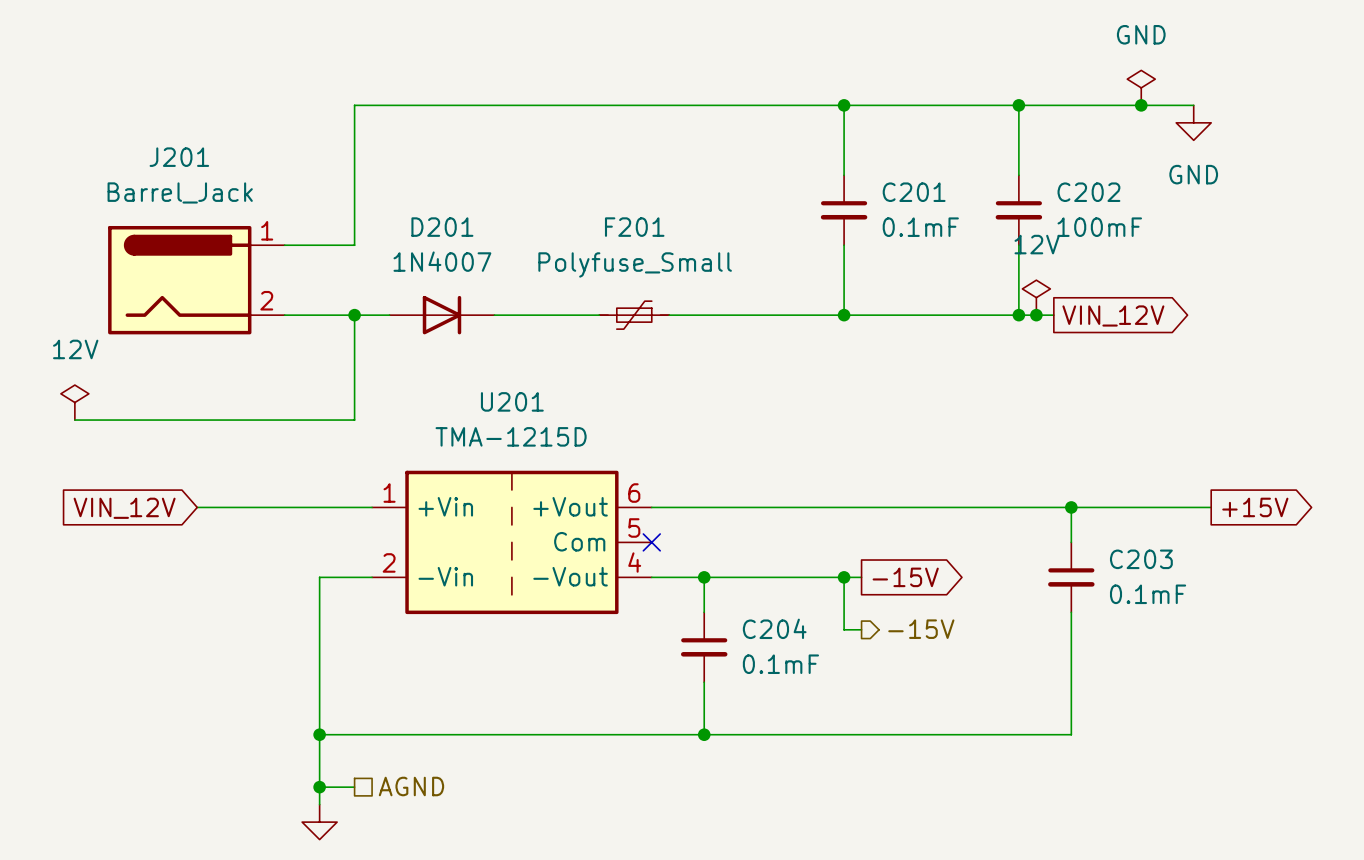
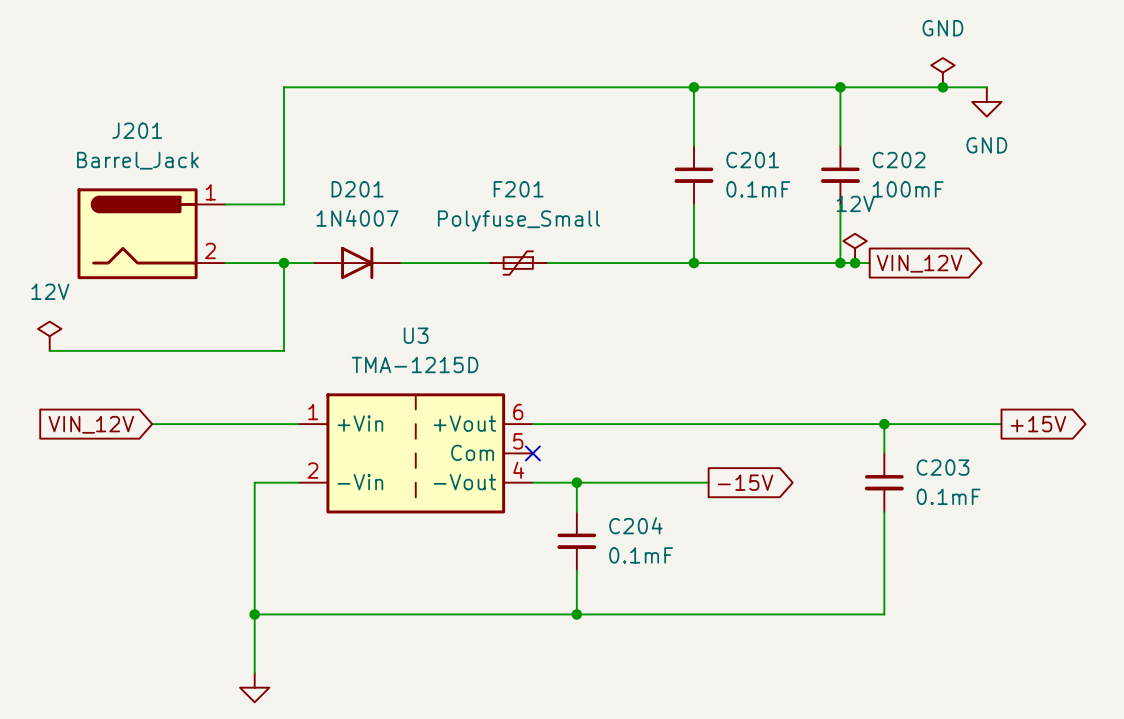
U201 name: U201 (512, 401) -> U3 (416, 335)
wire: (844, 577) (844, 629) (861, 629) -> none
junction: (844, 577) -> none
hierarchical label: -15V (921, 629) -> none
hierarchical label: AGND (411, 786) -> none
wire: (319, 787) (354, 787) -> none
junction: (319, 787) -> none

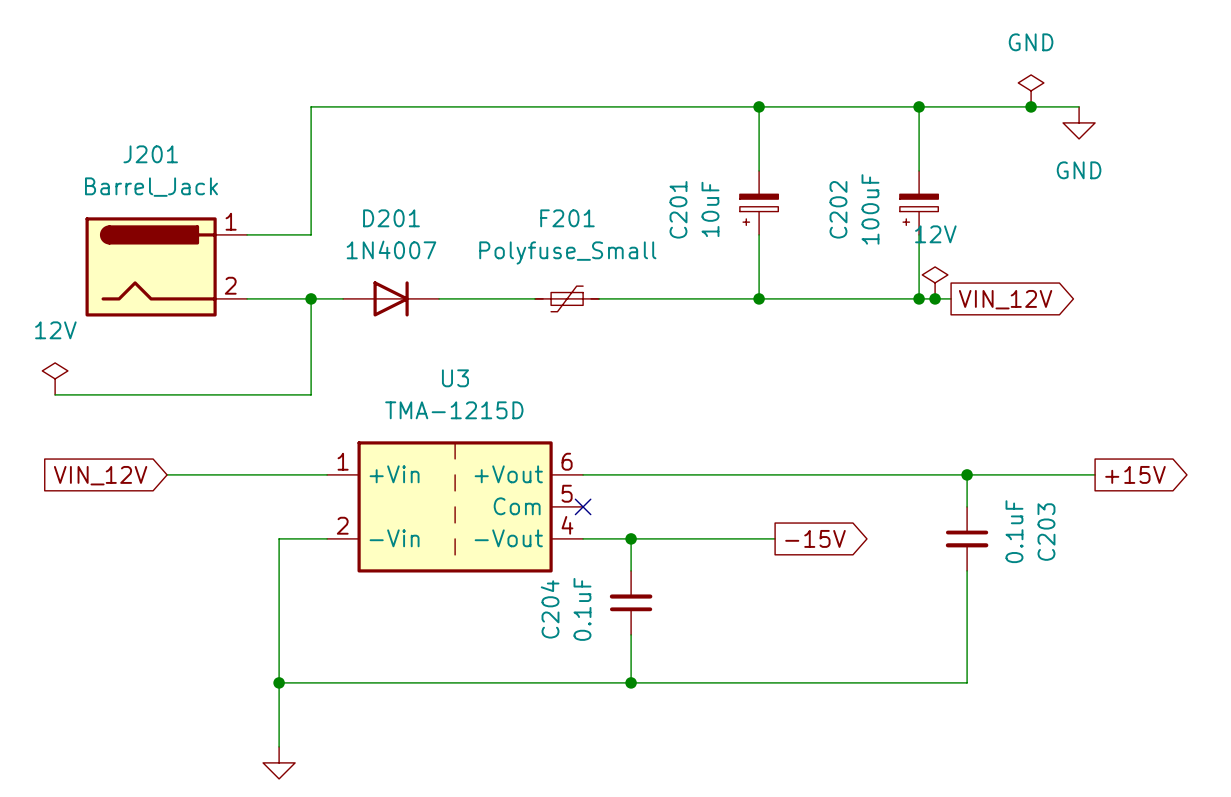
C201 symbol: [674, 145, 714, 205] -> [739, 170, 779, 235]
C202 symbol: [820, 145, 860, 205] -> [899, 170, 939, 235]
C201 name position: C201 (752, 160) -> C201 (678, 209)
C202 name position: C202 (899, 160) -> C202 (838, 209)
C201 value: 0.1mF (758, 189) -> 10uF (710, 209)
C202 value: 100mF (908, 189) -> 100uF (870, 209)
C203 name rotation: 0° (943, 467) -> 90° counterclockwise (1046, 532)
C203 value: 0.1mF (948, 496) -> 0.1uF (1014, 531)
C204 rotation: 0° (576, 541) -> 180° (631, 602)
C204 value: 0.1mF (641, 555) -> 0.1uF (582, 609)

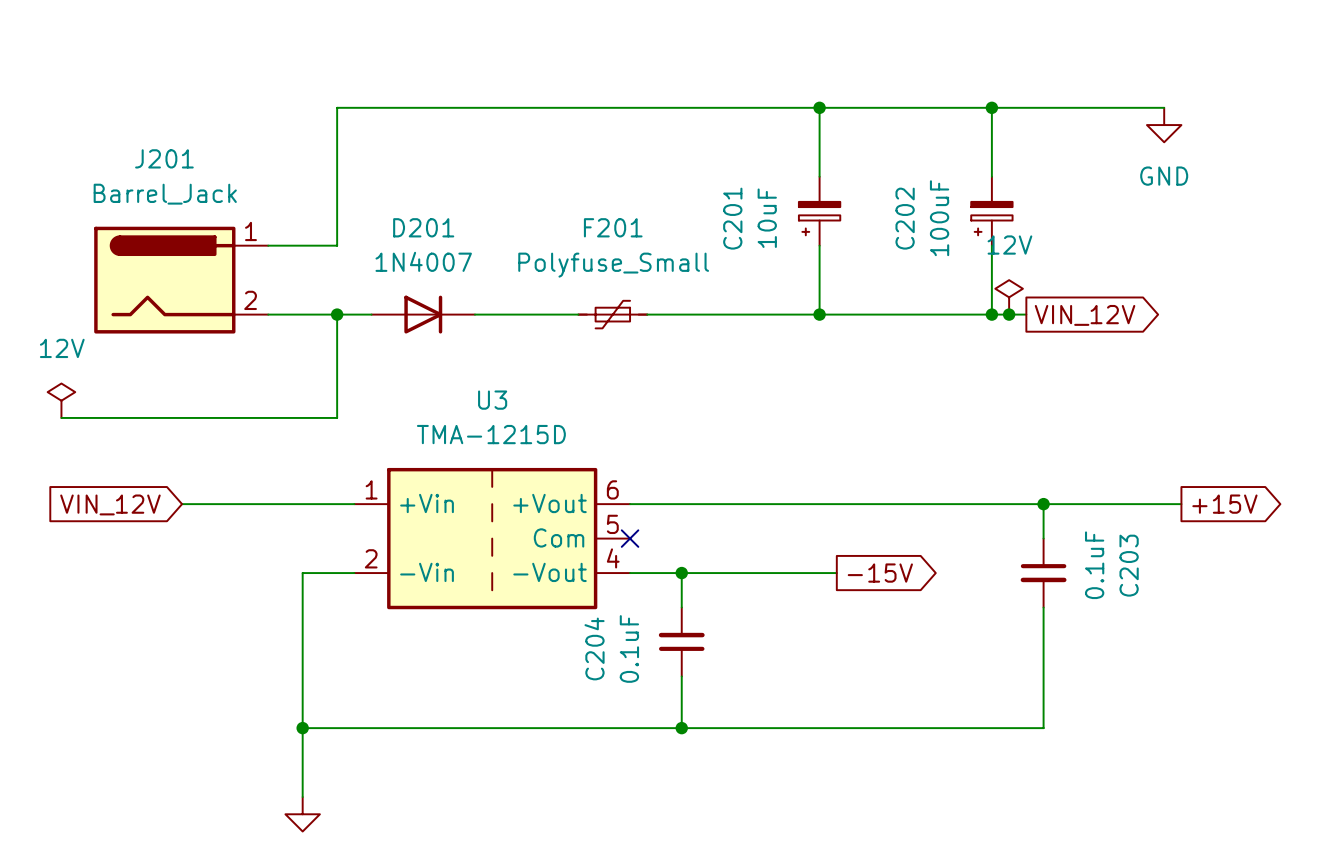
power symbol: GND (1031, 90) -> none
junction: (1031, 106) -> none

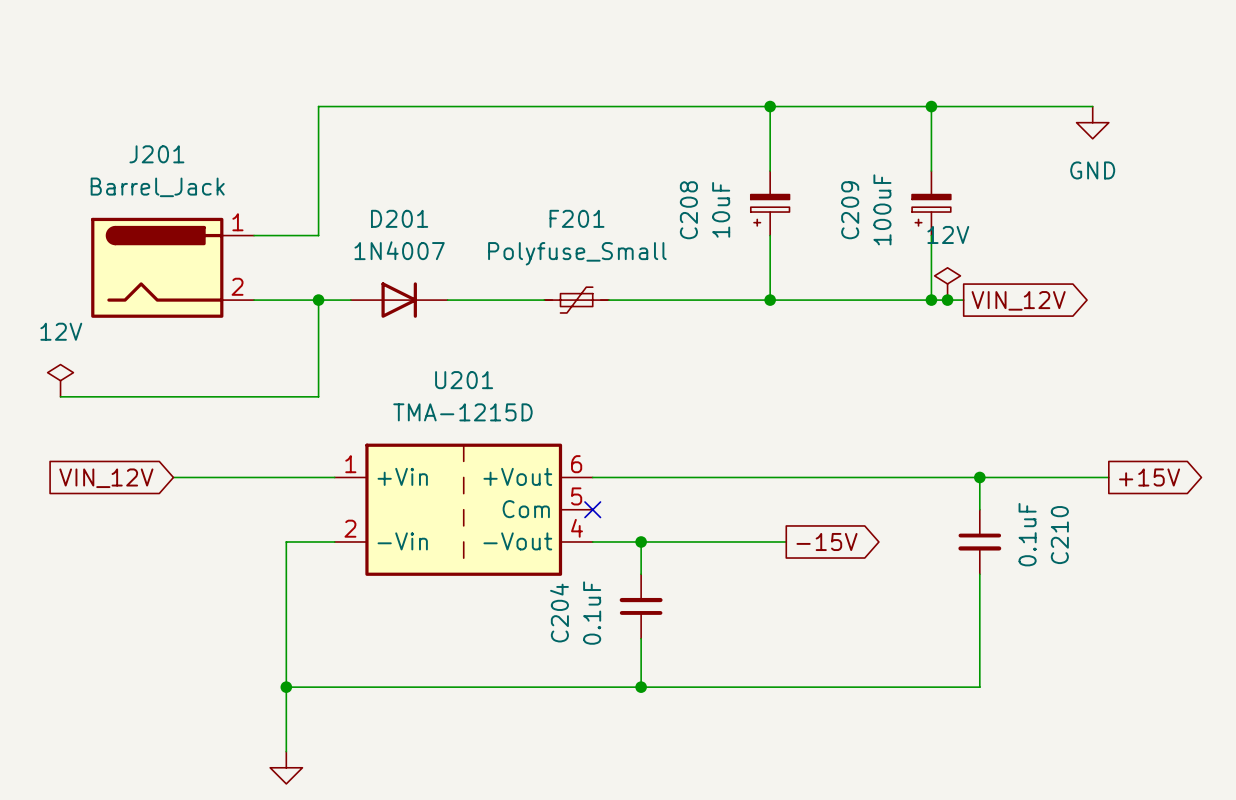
C201 name: C201 (732, 218) -> C208 (688, 210)
C202 name: C202 (905, 218) -> C209 (850, 210)
U3 name: U3 (492, 400) -> U201 (464, 380)
C203 name: C203 (1129, 565) -> C210 (1059, 535)

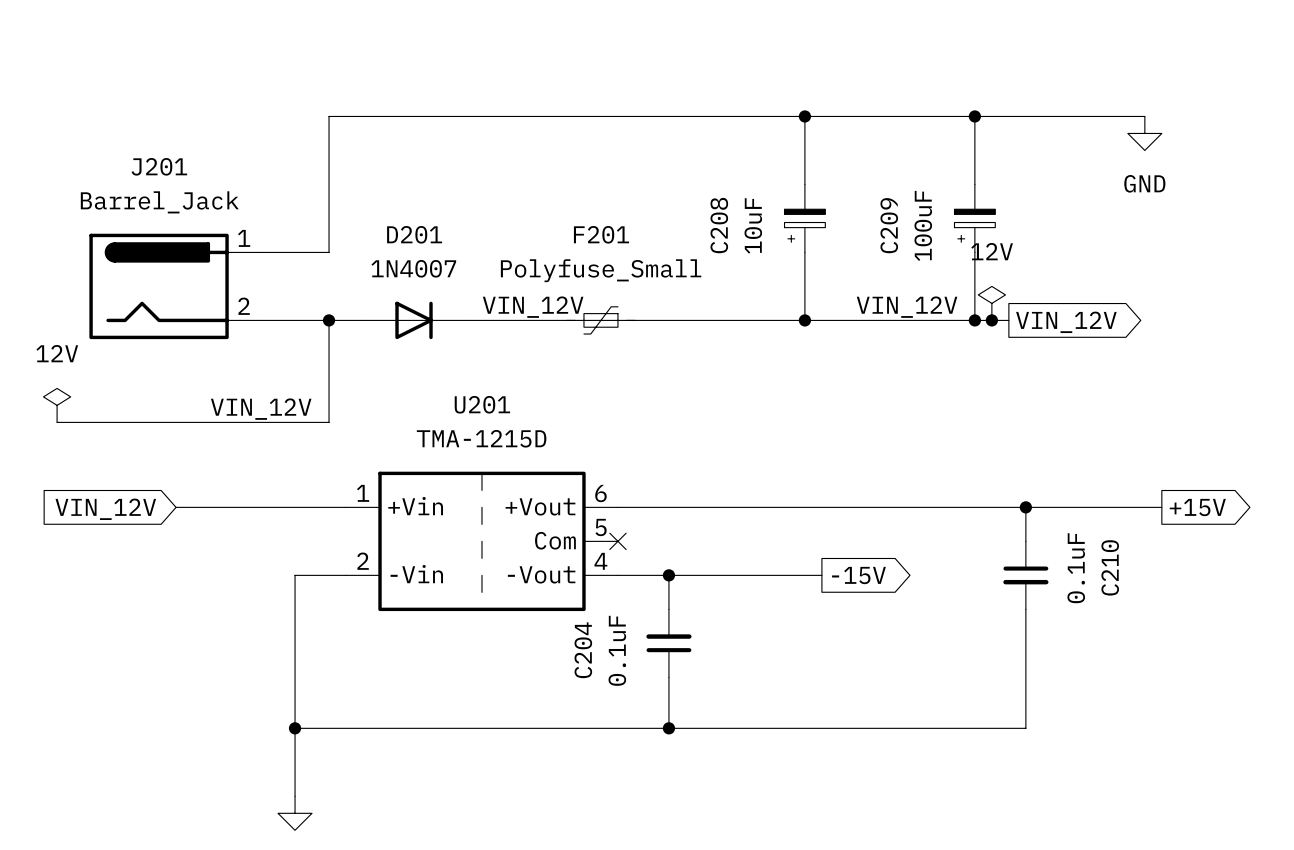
label: none -> VIN_12V (533, 307)
label: none -> VIN_12V (907, 307)
label: none -> VIN_12V (261, 409)

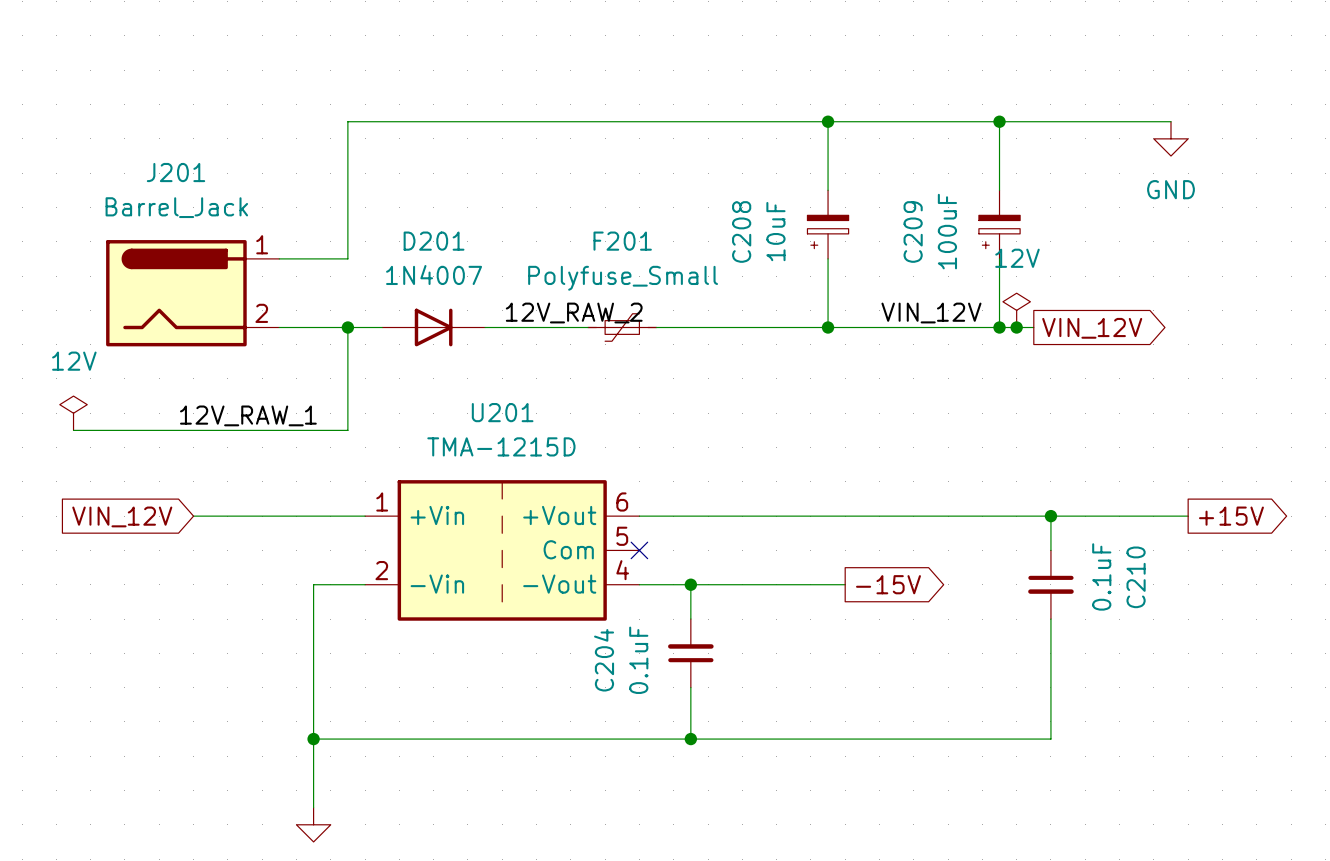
label: VIN_12V (533, 307) -> 12V_RAW_2 (574, 313)
label: none -> 12V_RAW_1 (248, 415)
label: VIN_12V (261, 409) -> none

